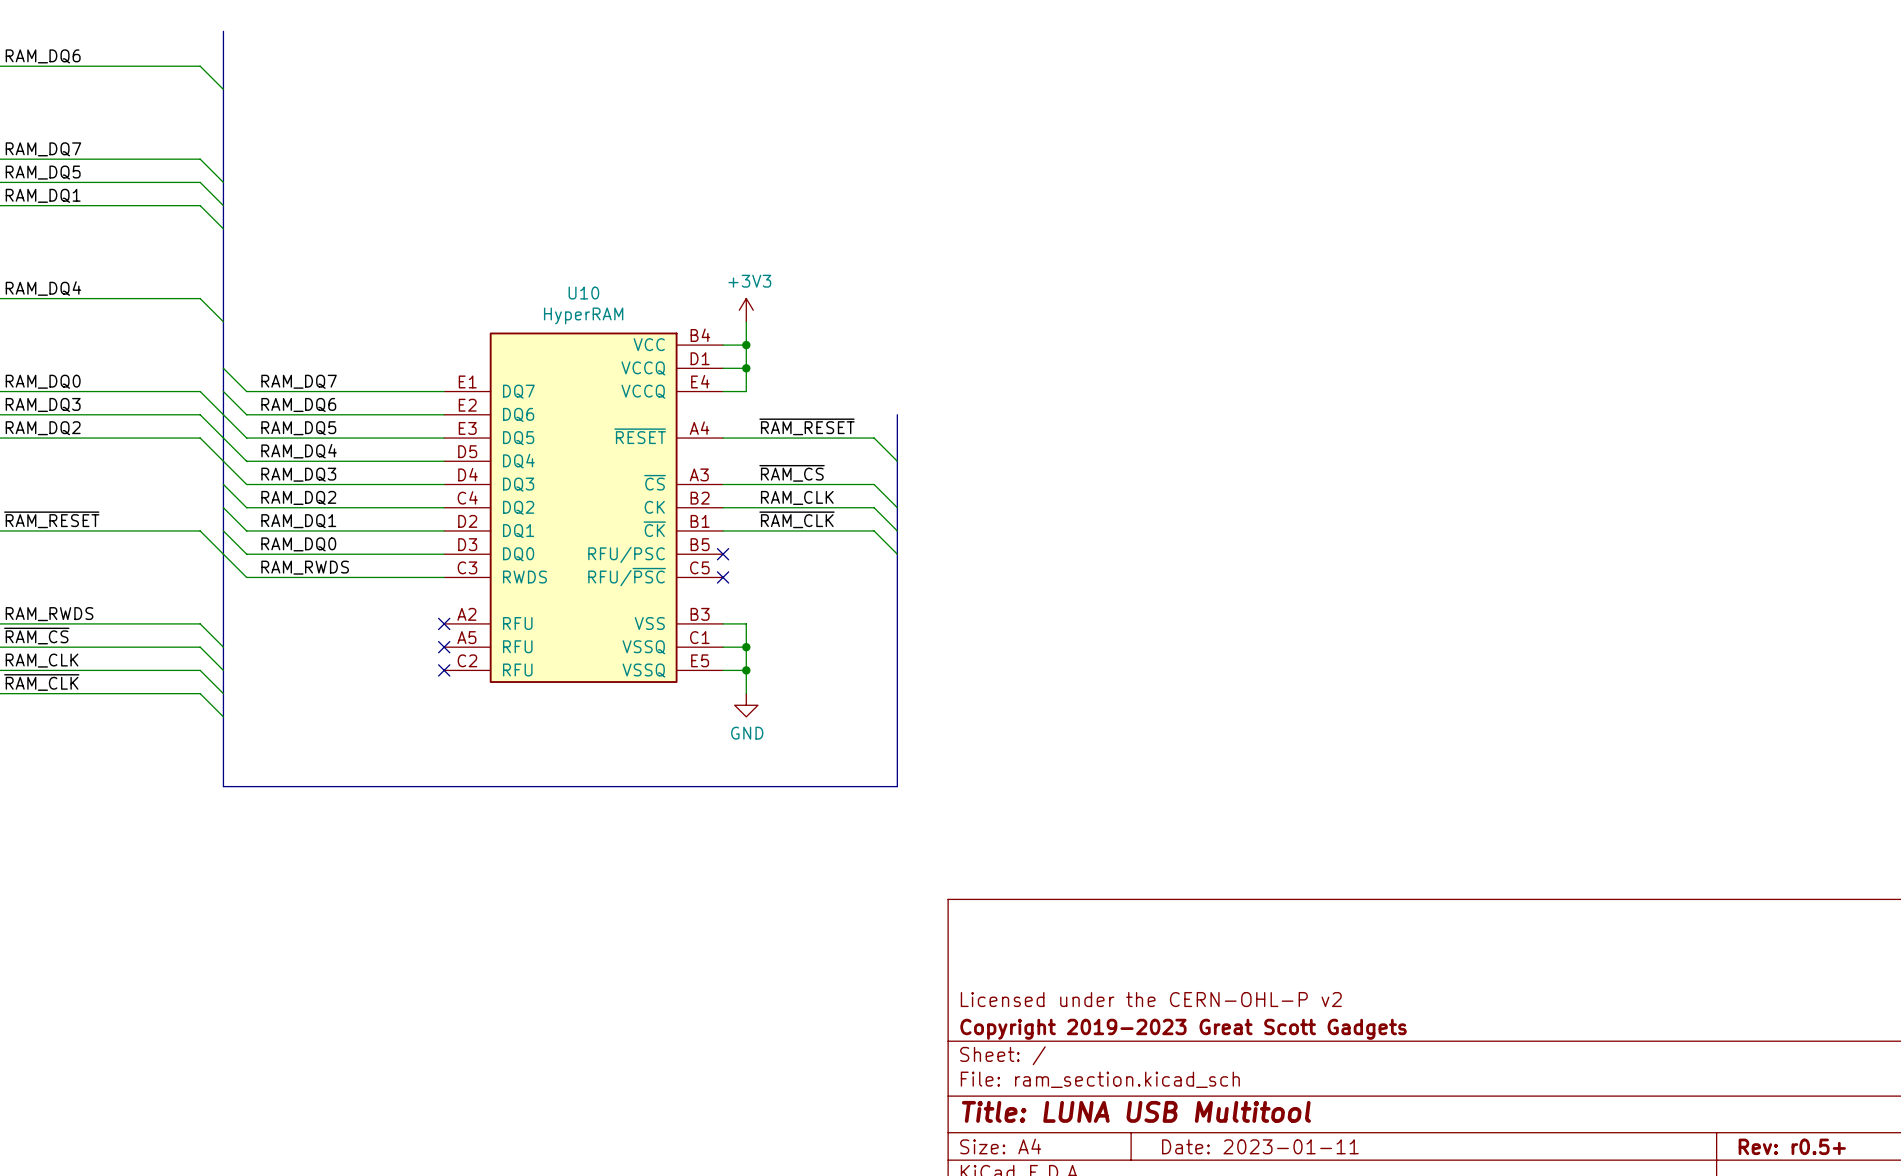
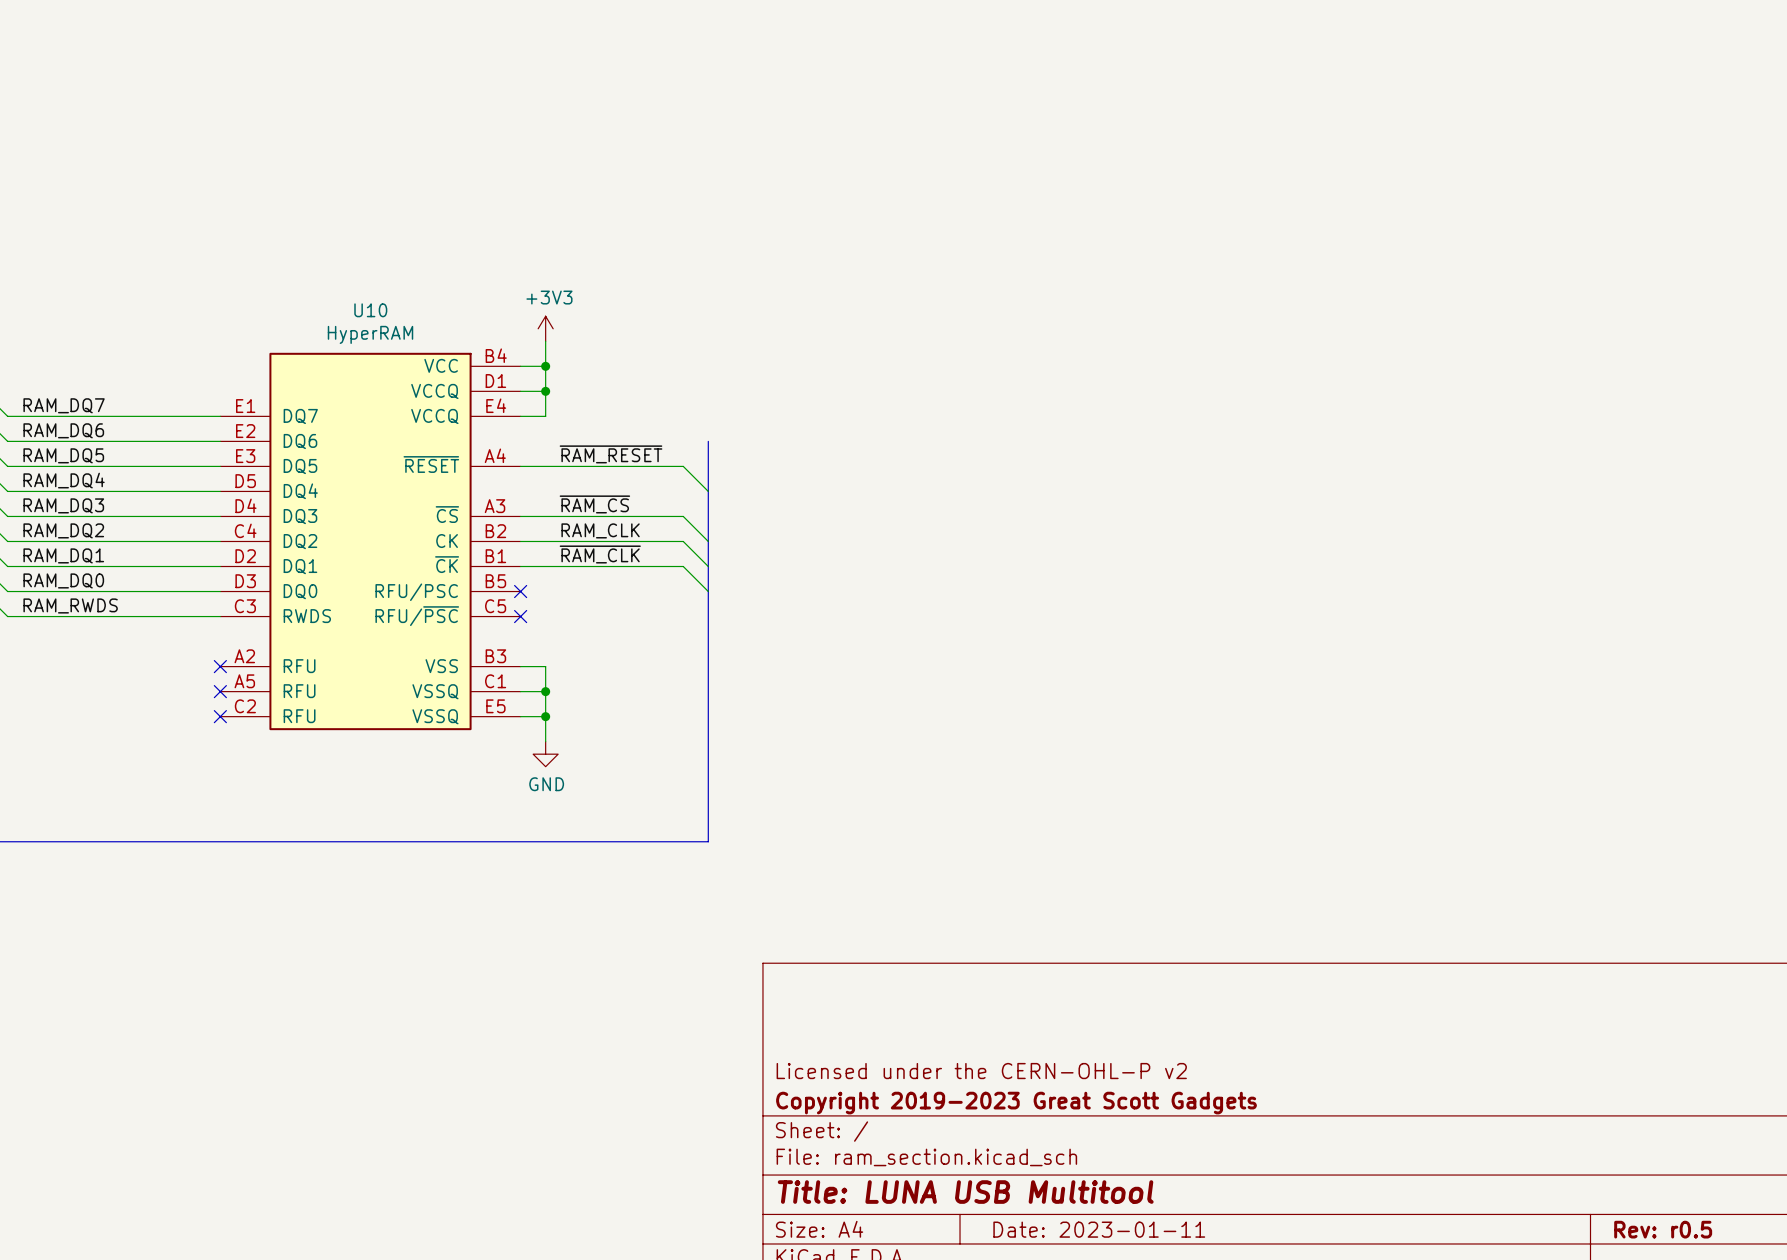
title block: Rev: r0.5+ (1792, 1146) -> Rev: r0.5 (1663, 1229)

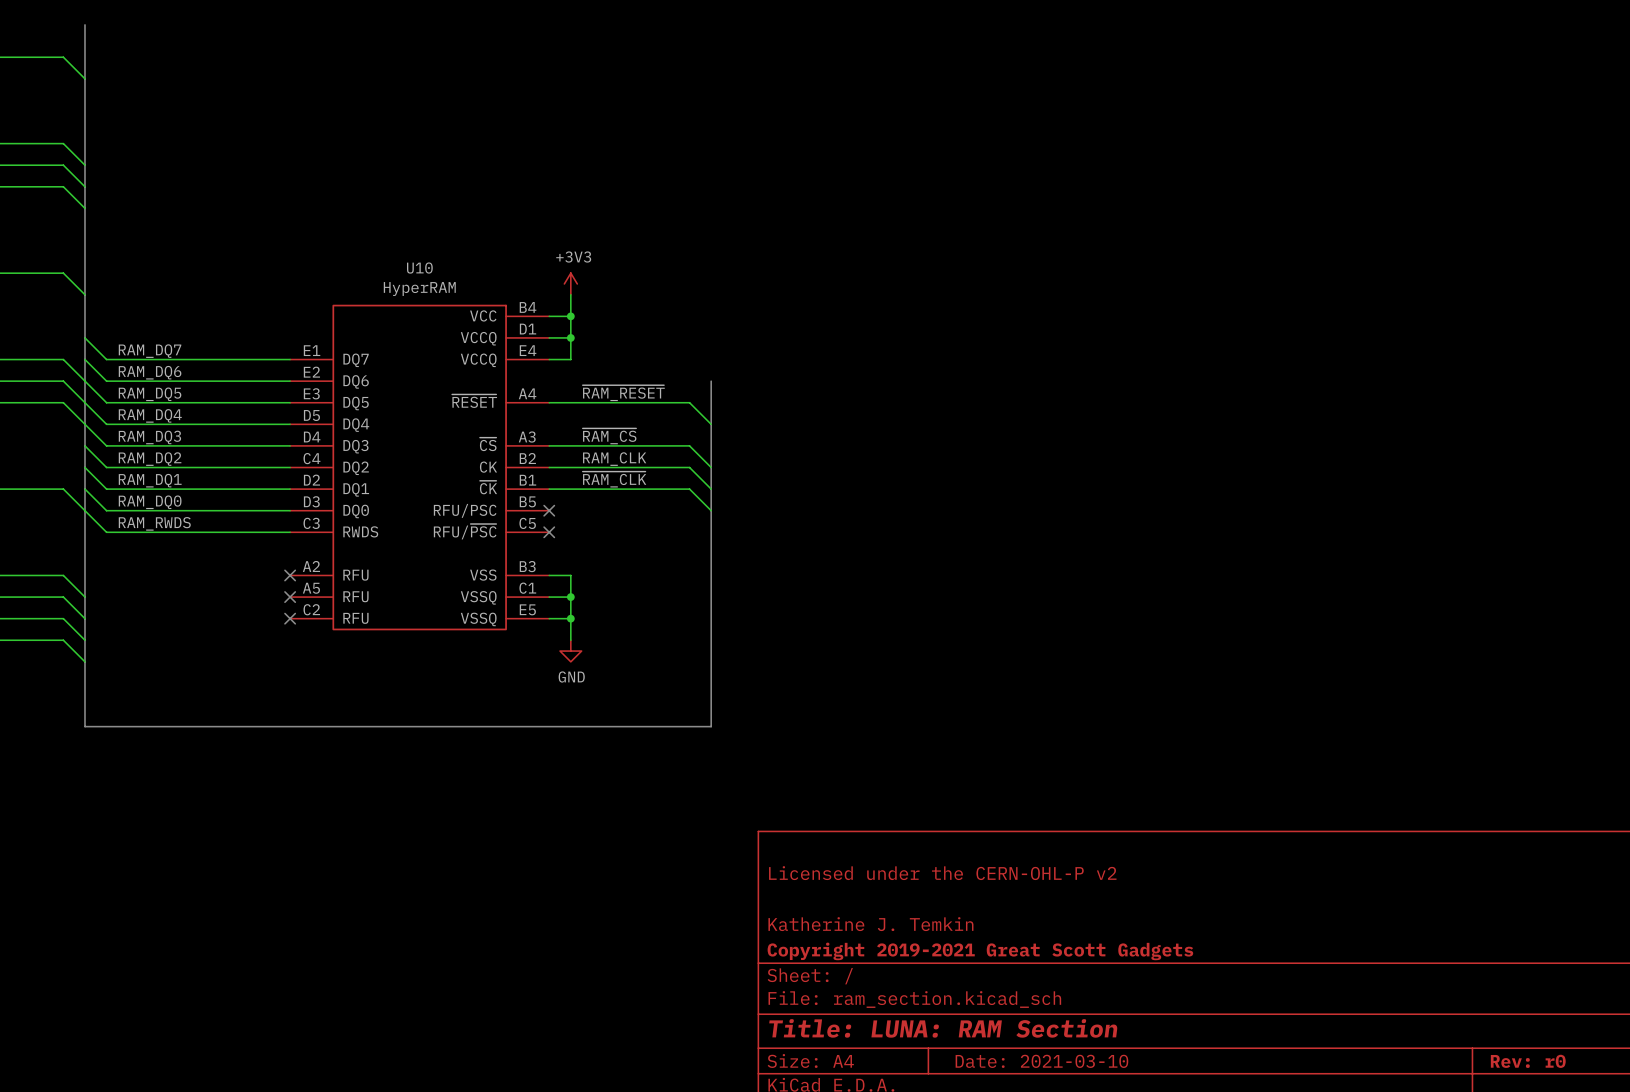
title block: none -> Licensed under the CERN-OHL-P v2 (942, 873)
title block: Licensed under the CERN-OHL-P v2 (981, 1071) -> Katherine J. Temkin (870, 924)
title block: Copyright 2019-2023 Great Scott Gadgets (1016, 1103) -> Copyright 2019-2021 Great Scott Gadgets (980, 951)
title block: Title: LUNA USB Multitool (965, 1192) -> Title: LUNA: RAM Section (943, 1028)
title block: Date: 2023-01-11 (1099, 1229) -> Date: 2021-03-10 (1041, 1061)
title block: Rev: r0.5 (1663, 1229) -> Rev: r0 (1528, 1061)

